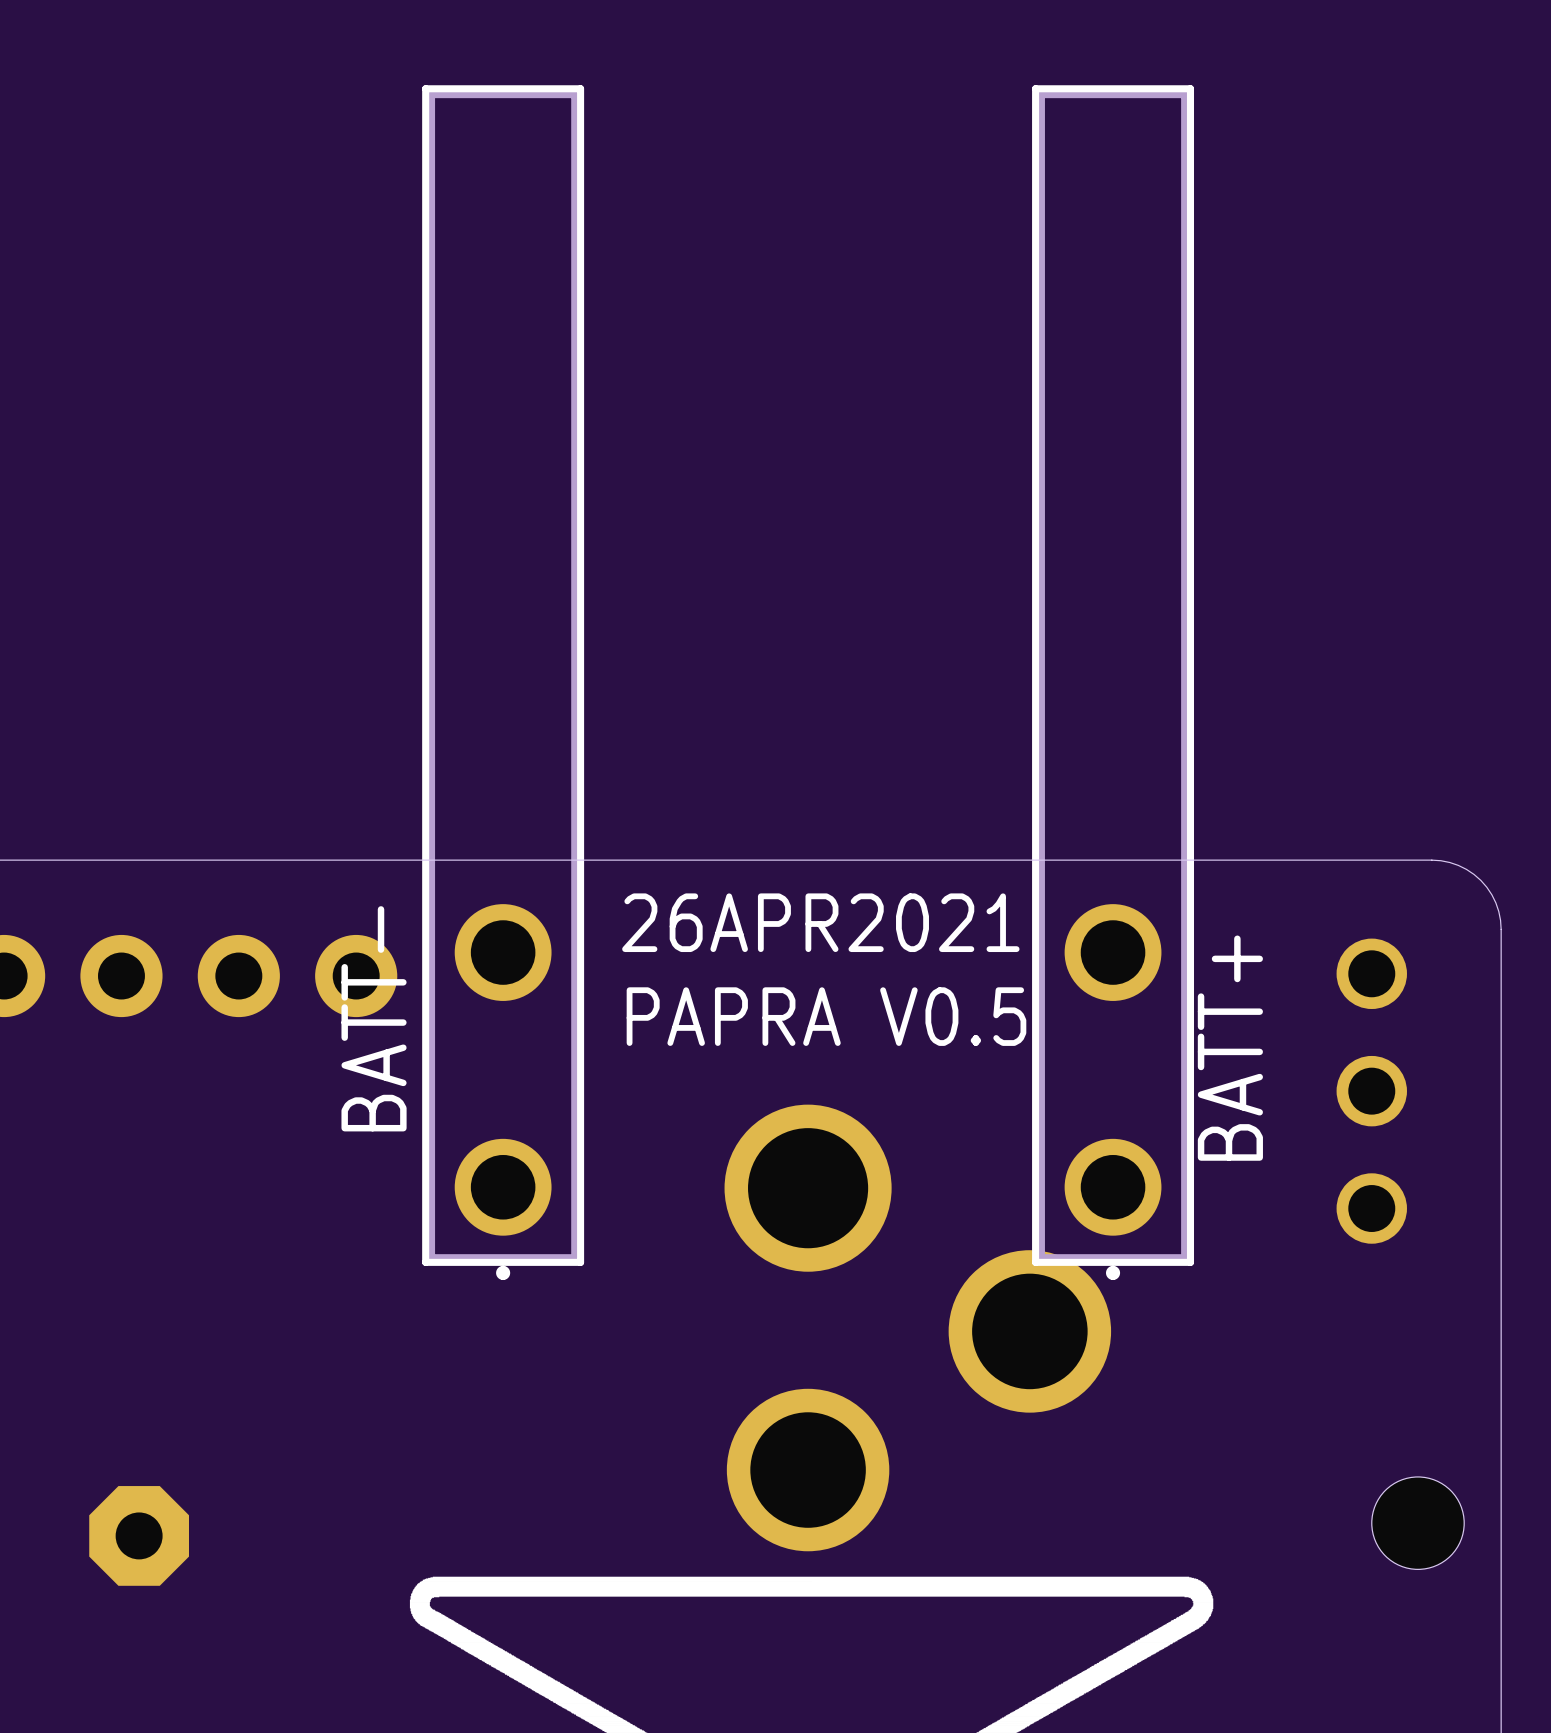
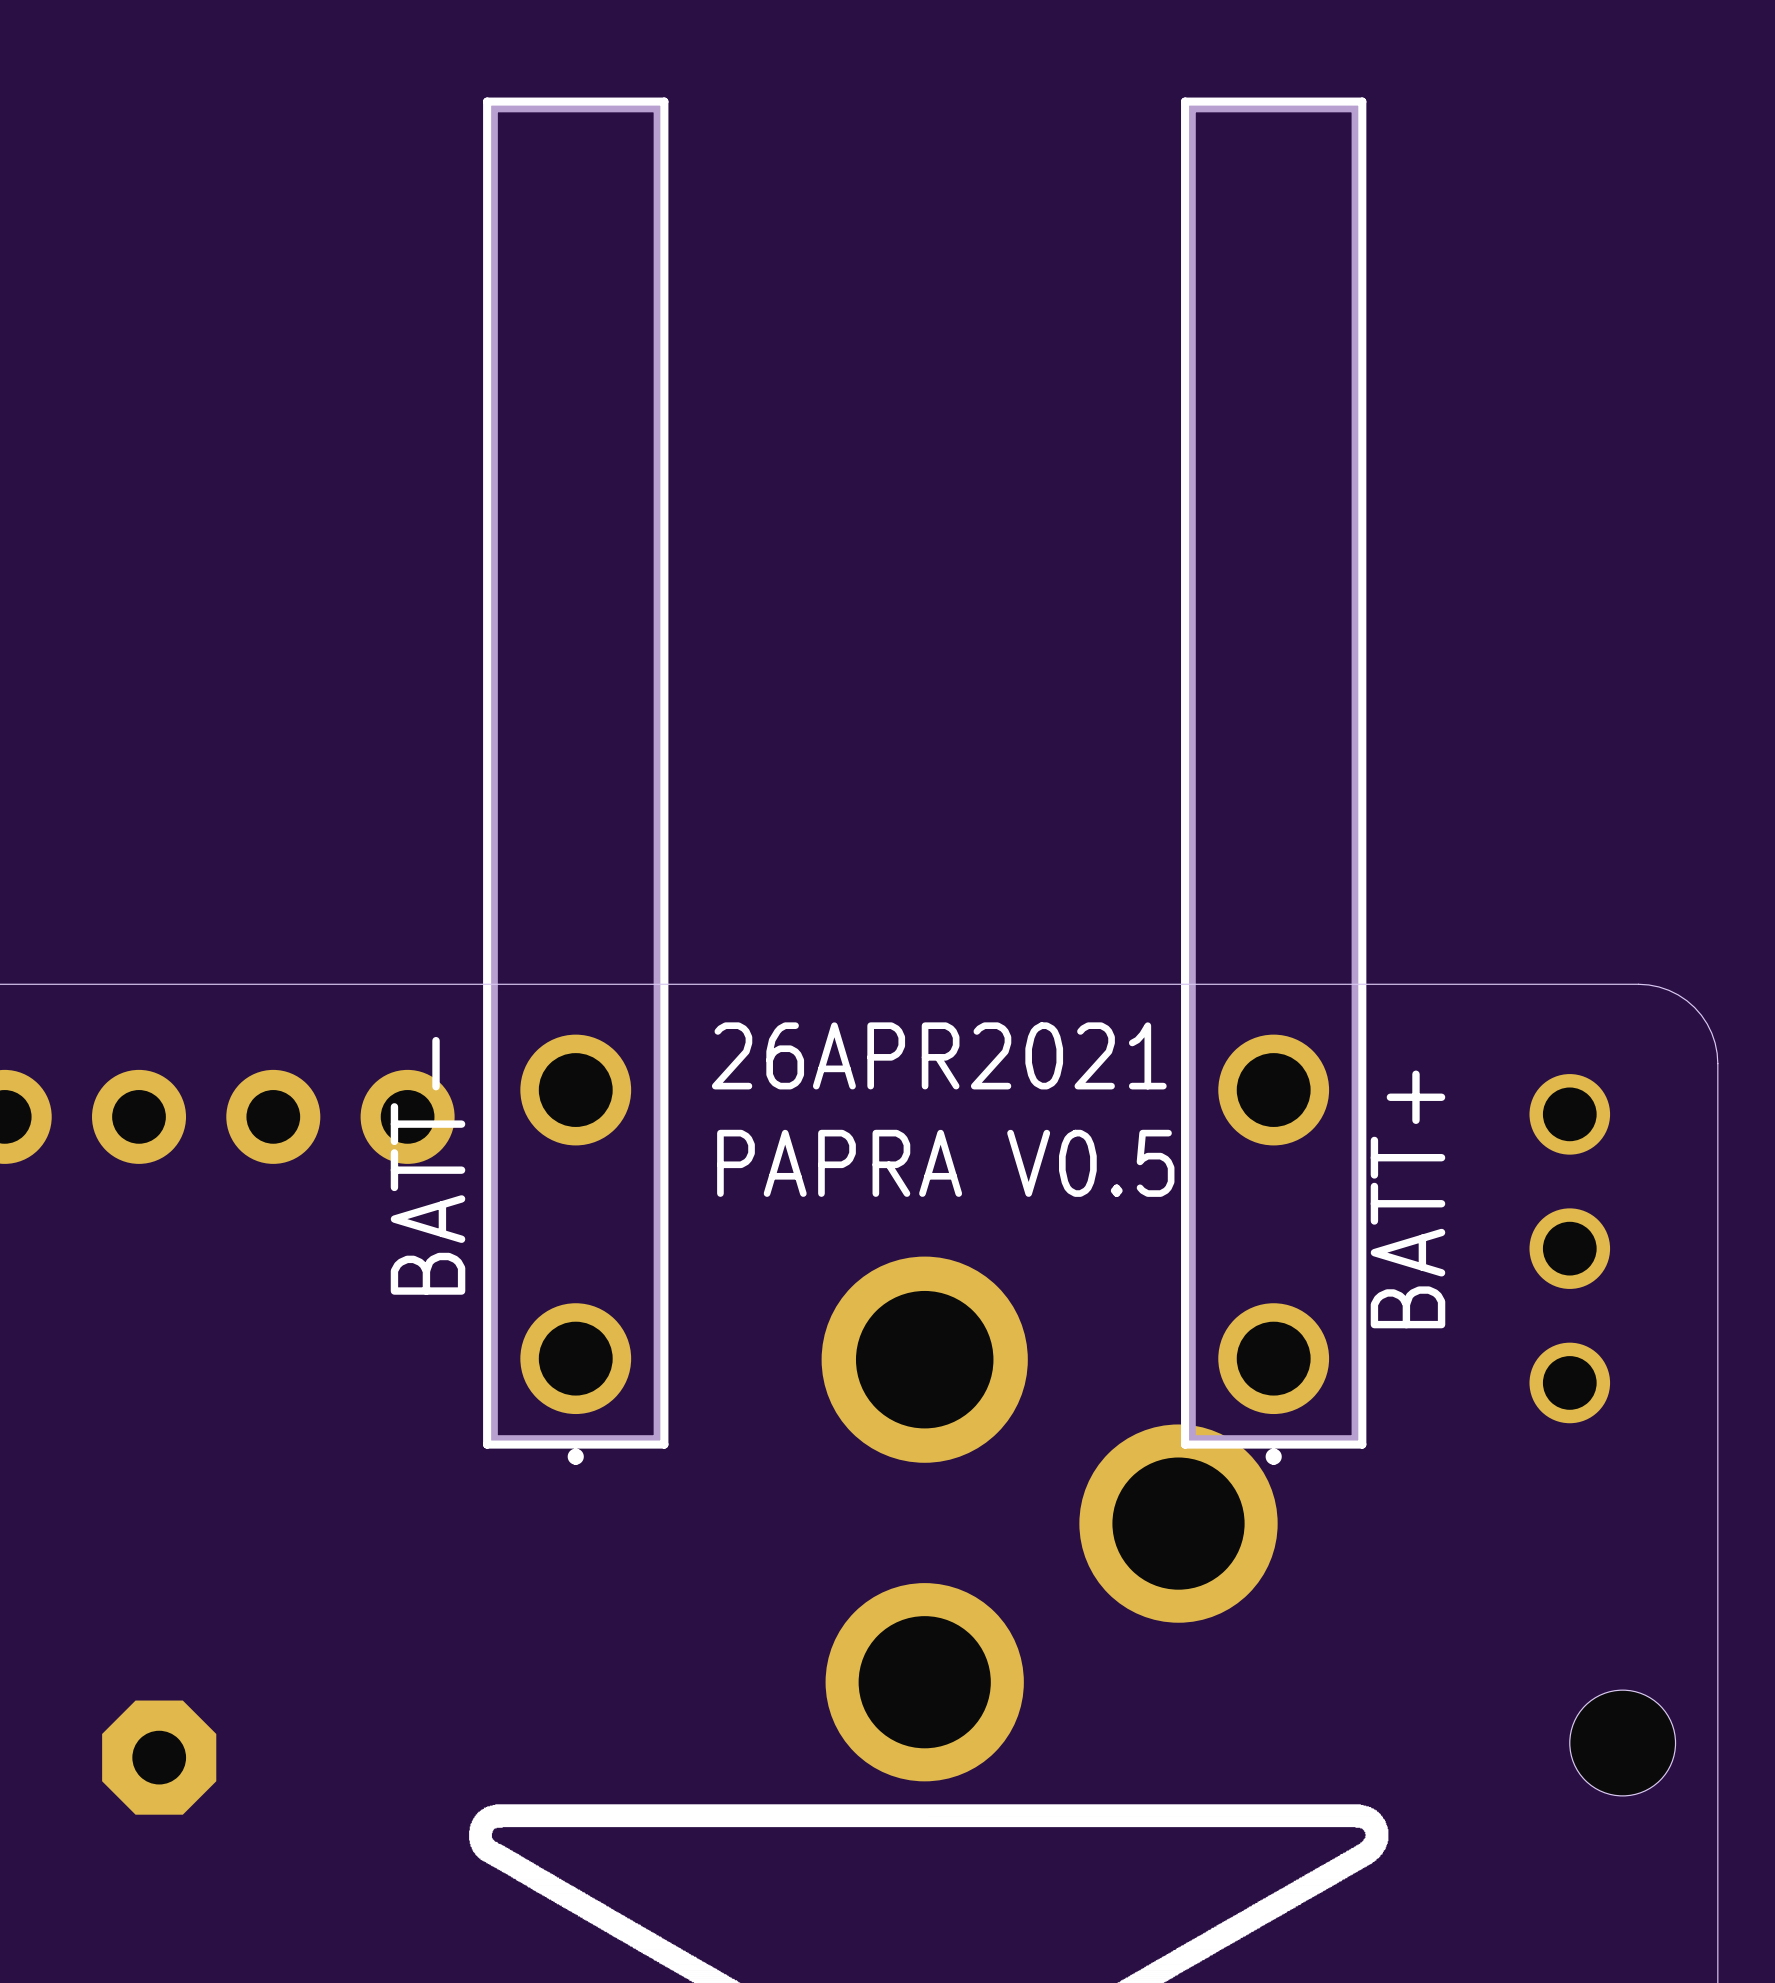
part footprint: [724, 1104, 1112, 1552] -> [821, 1256, 1278, 1782]

